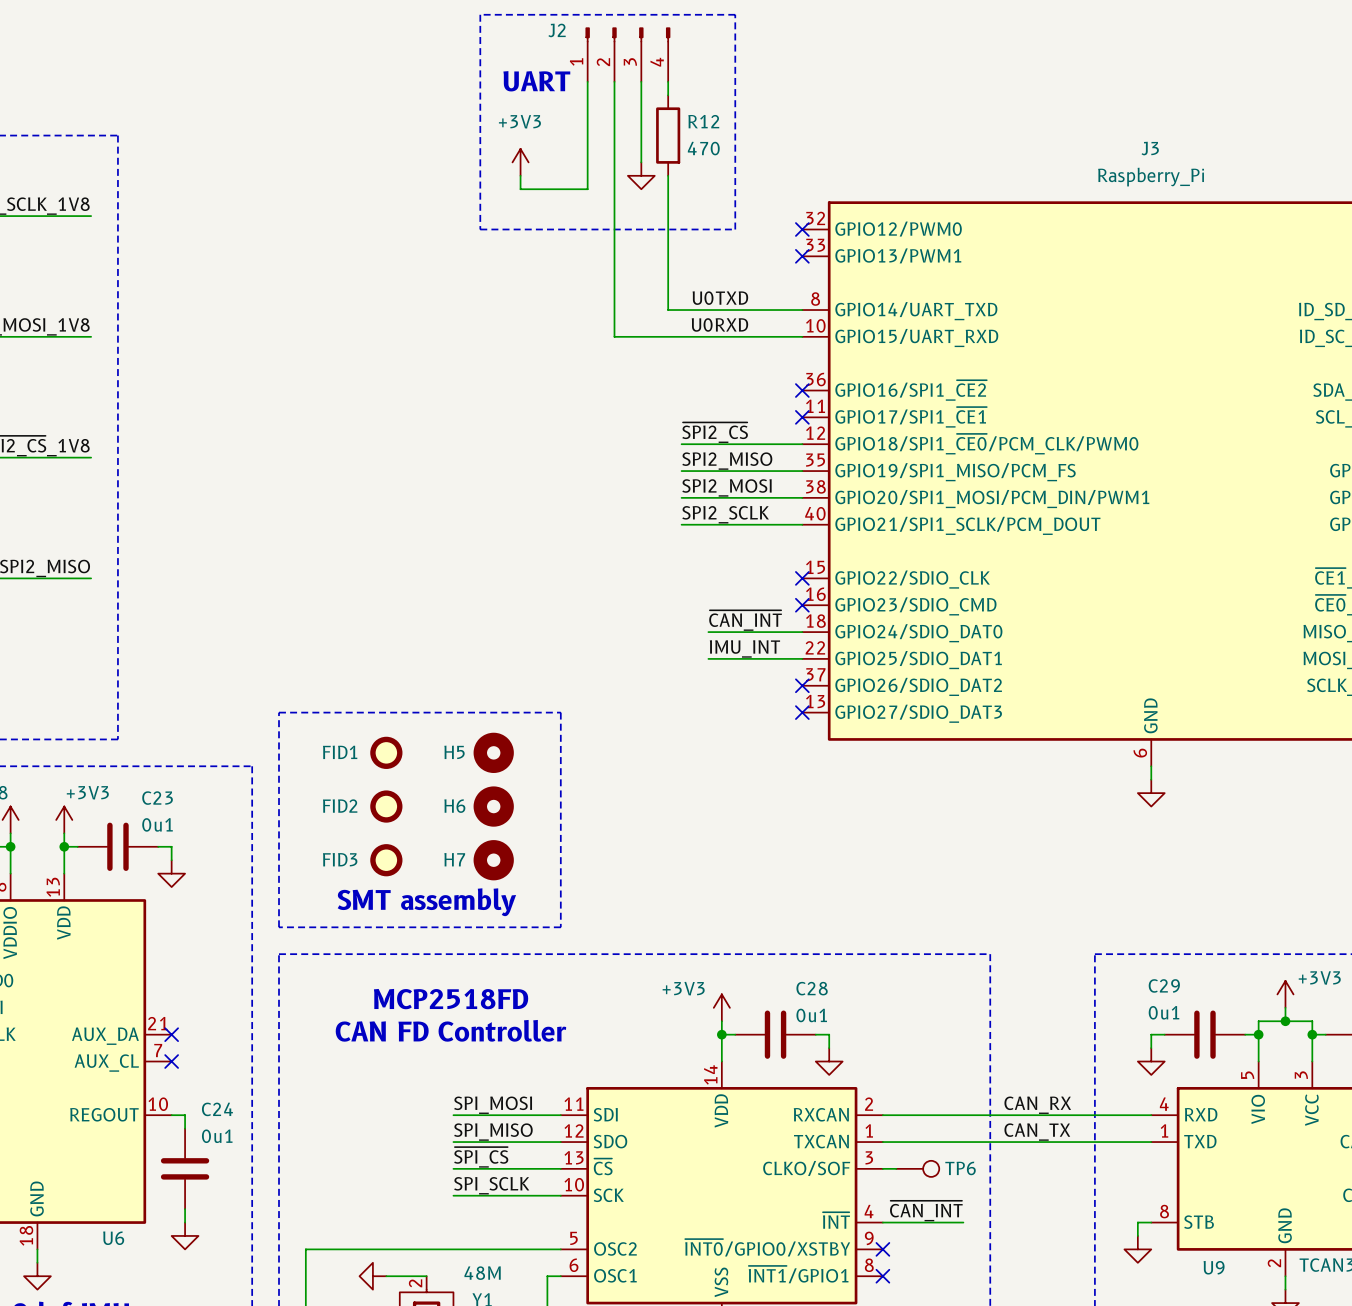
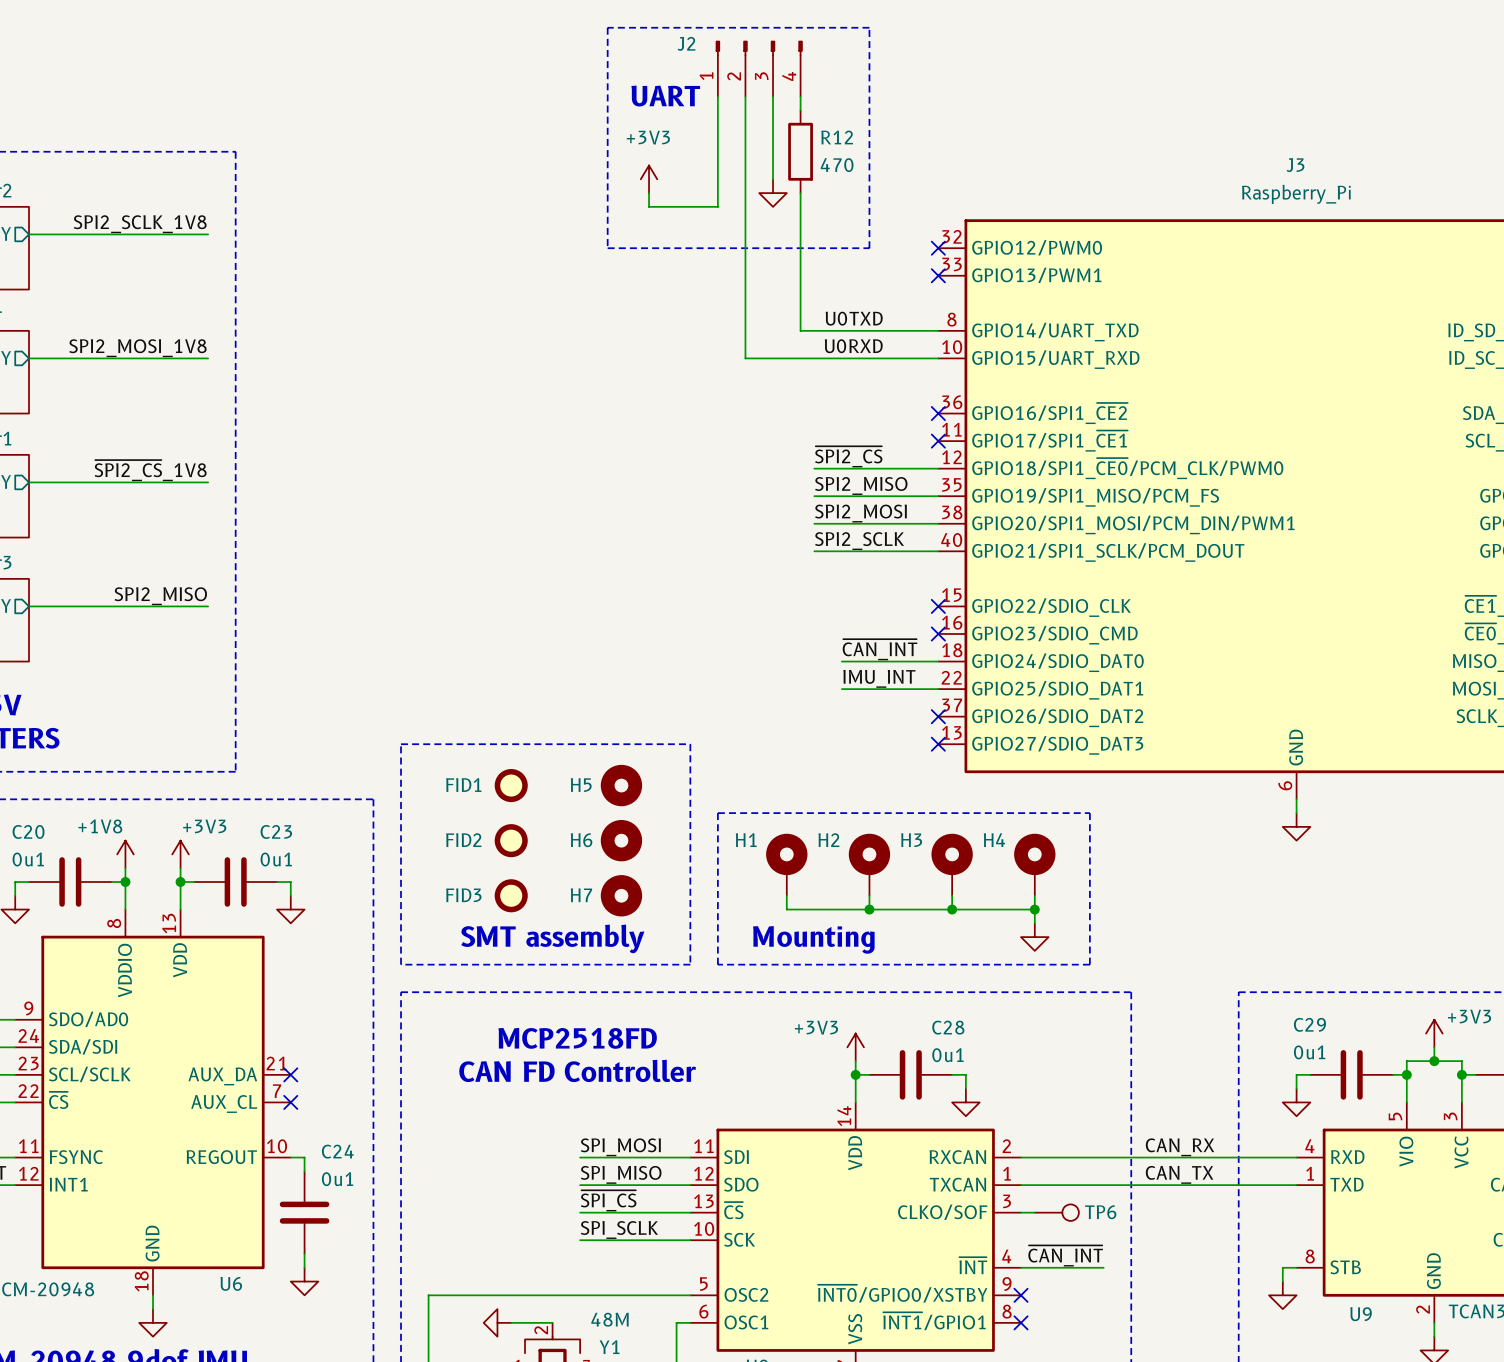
line: none -> (717, 813) (1089, 813) (1089, 964) (717, 964) (717, 813)
H1: none -> (786, 864)
H2: none -> (869, 864)
H3: none -> (952, 864)
H4: none -> (1034, 864)
wire: none -> (786, 895) (786, 909) (1034, 909)
wire: none -> (869, 895) (869, 909)
wire: none -> (952, 895) (952, 909)
wire: none -> (1034, 895) (1034, 923)
junction: none -> (869, 909)
junction: none -> (952, 909)
junction: none -> (1034, 909)
power symbol: none -> (1034, 937)
text: none -> Mounting (813, 939)

